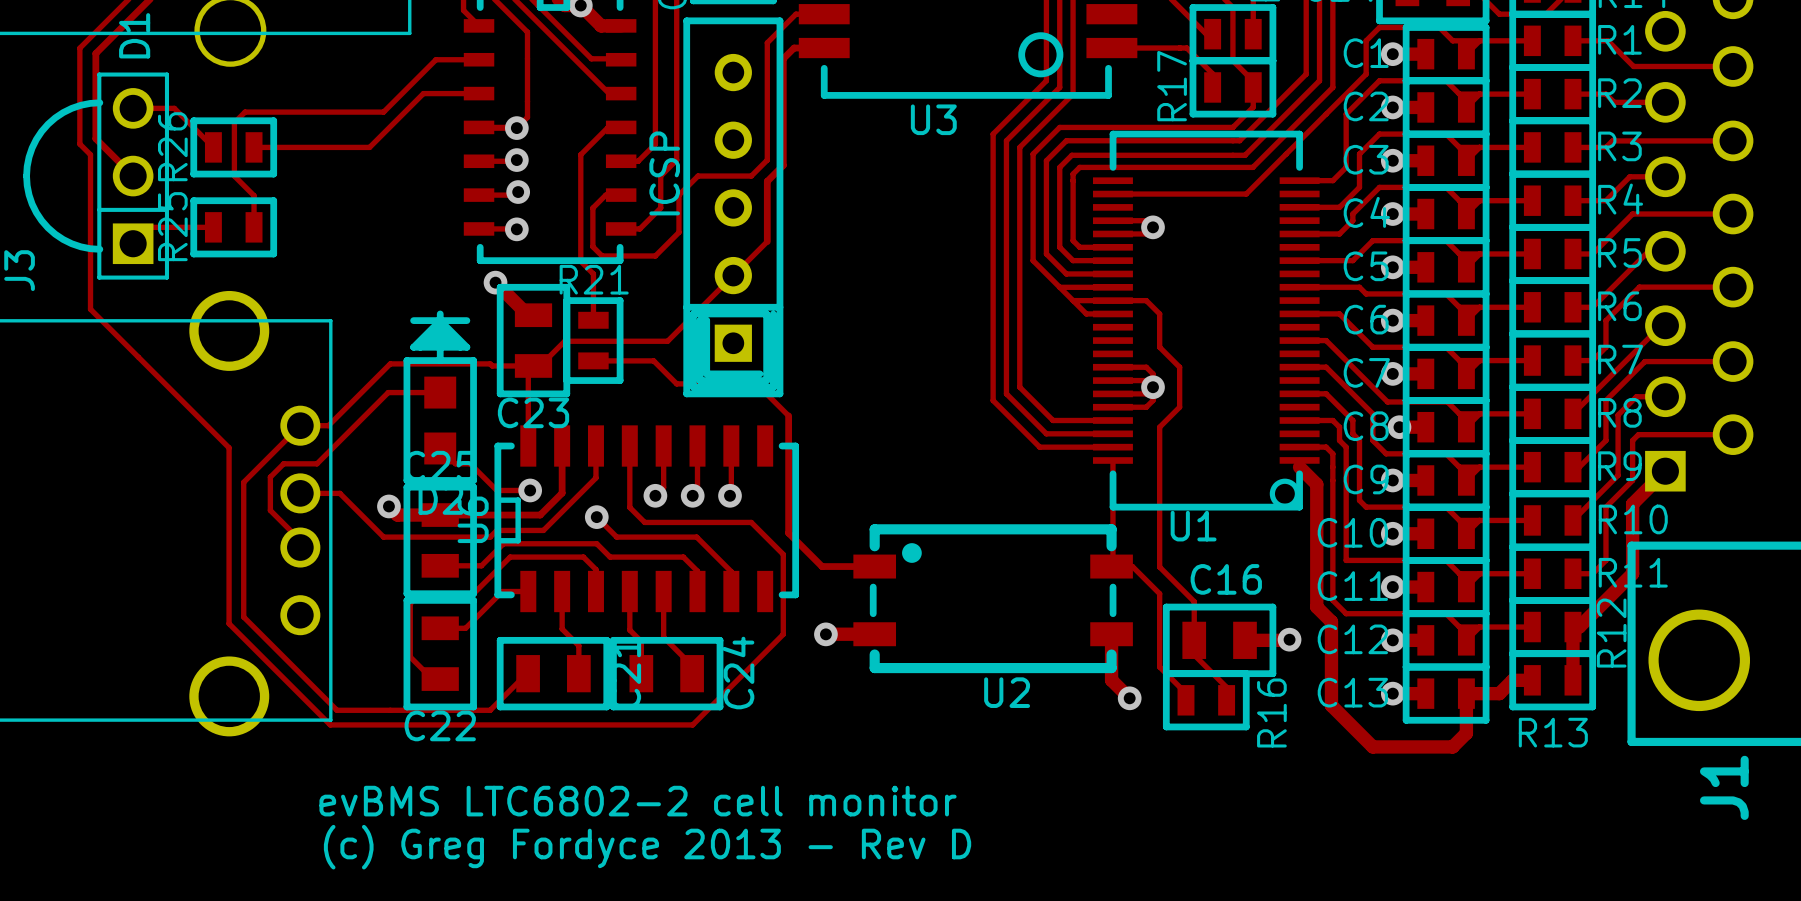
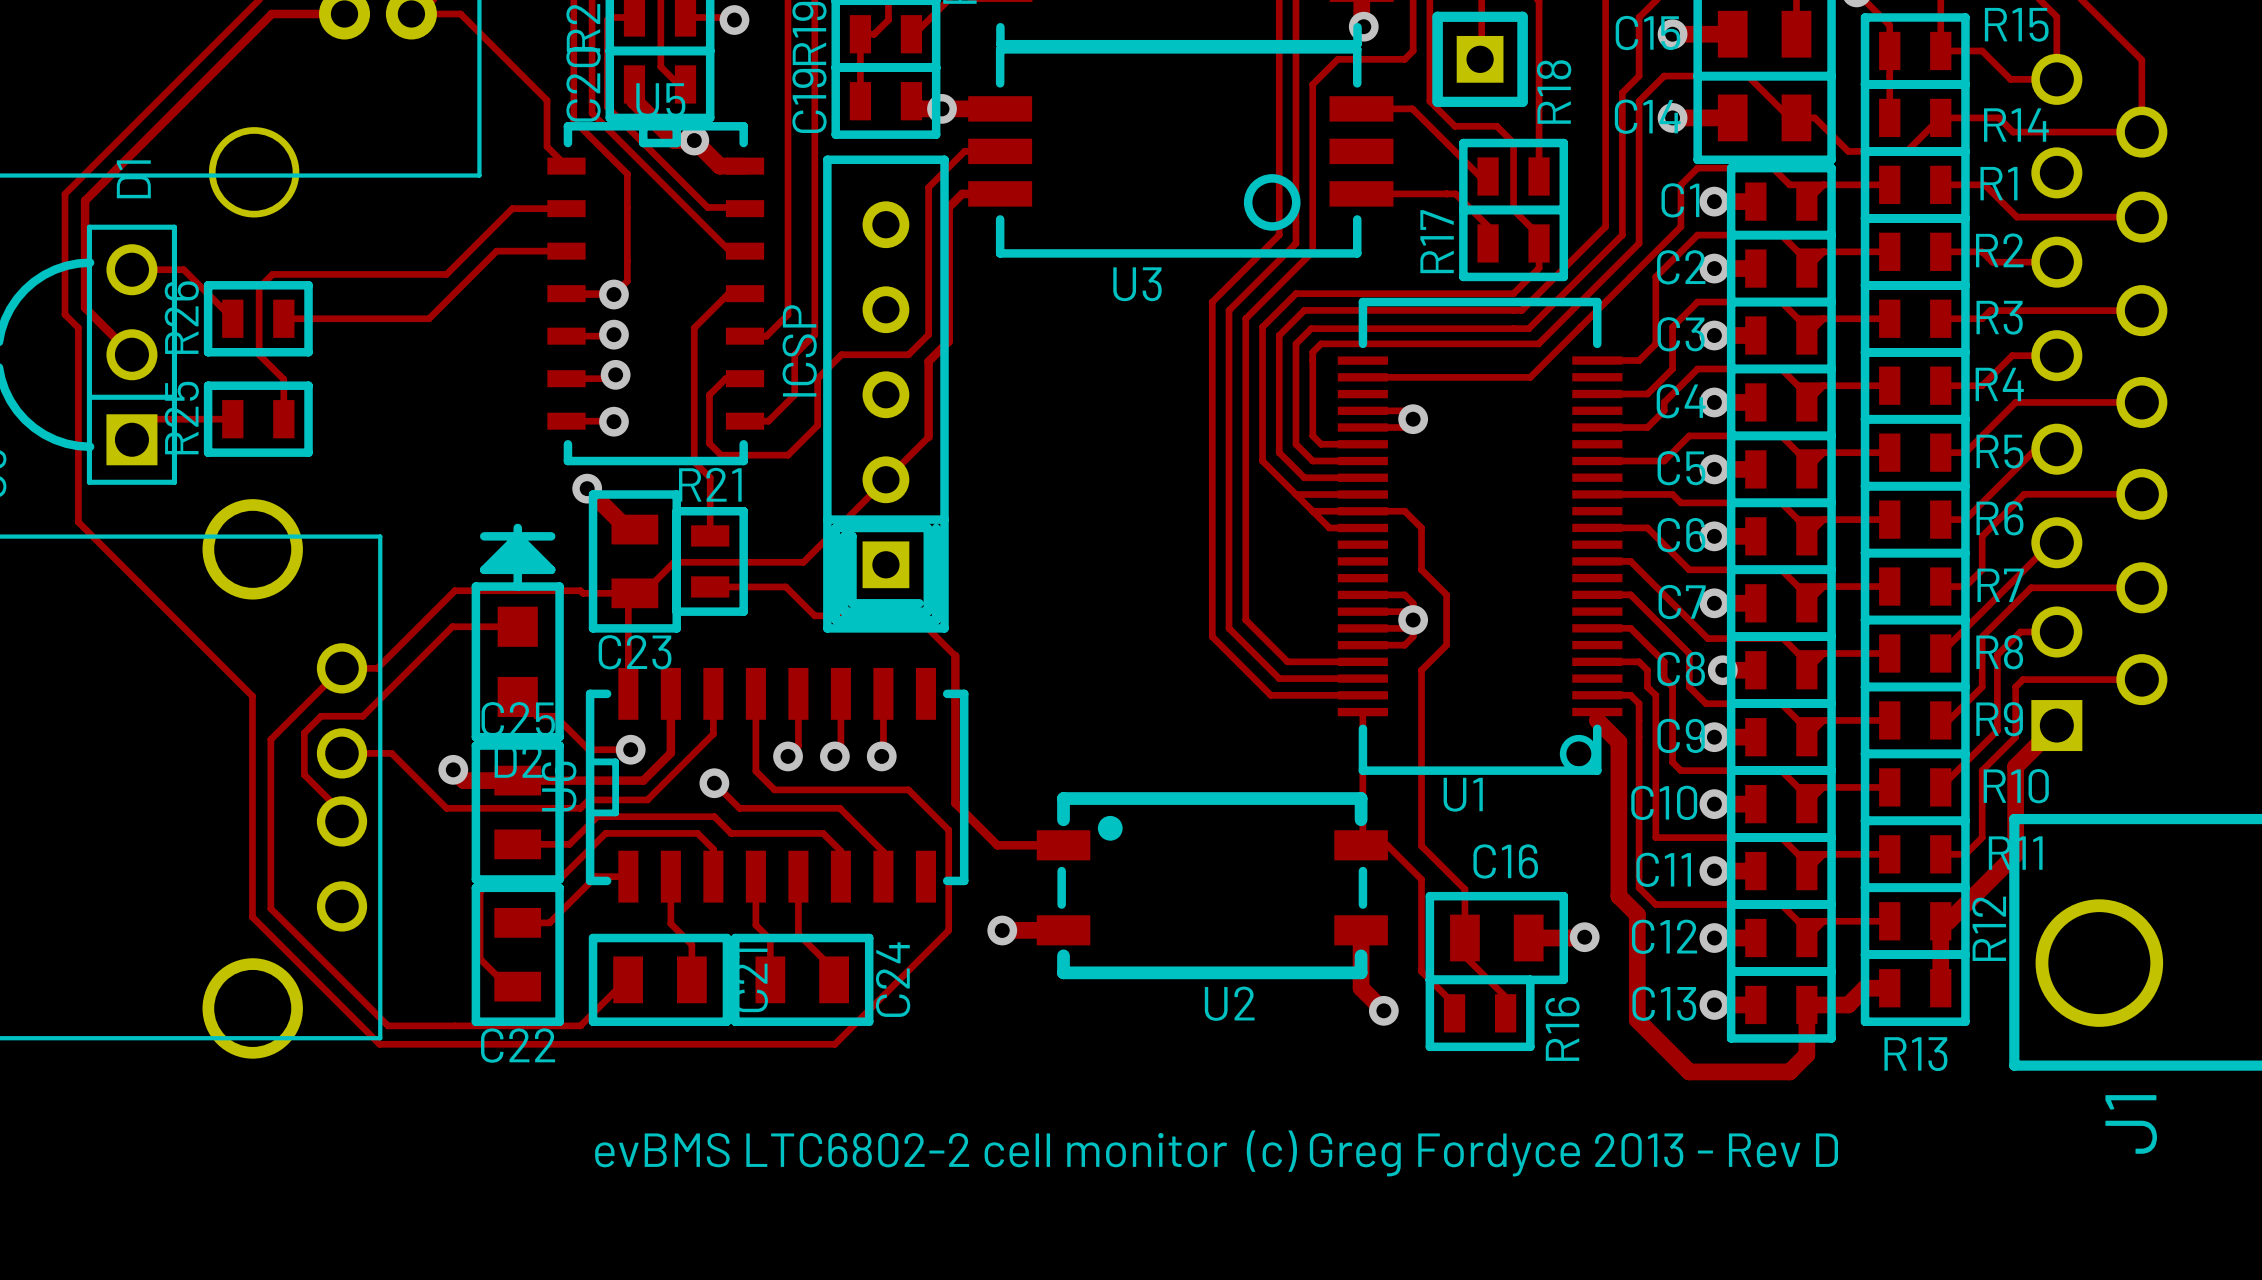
text: evBMS LTC6802-2 cell monitor (638, 801) -> none
text: none -> evBMS LTC6802-2 cell monitor (c) Greg Fordyce 2013 - Rev D (1216, 1153)
text: (c) Greg Fordyce 2013 - Rev D (647, 847) -> none

